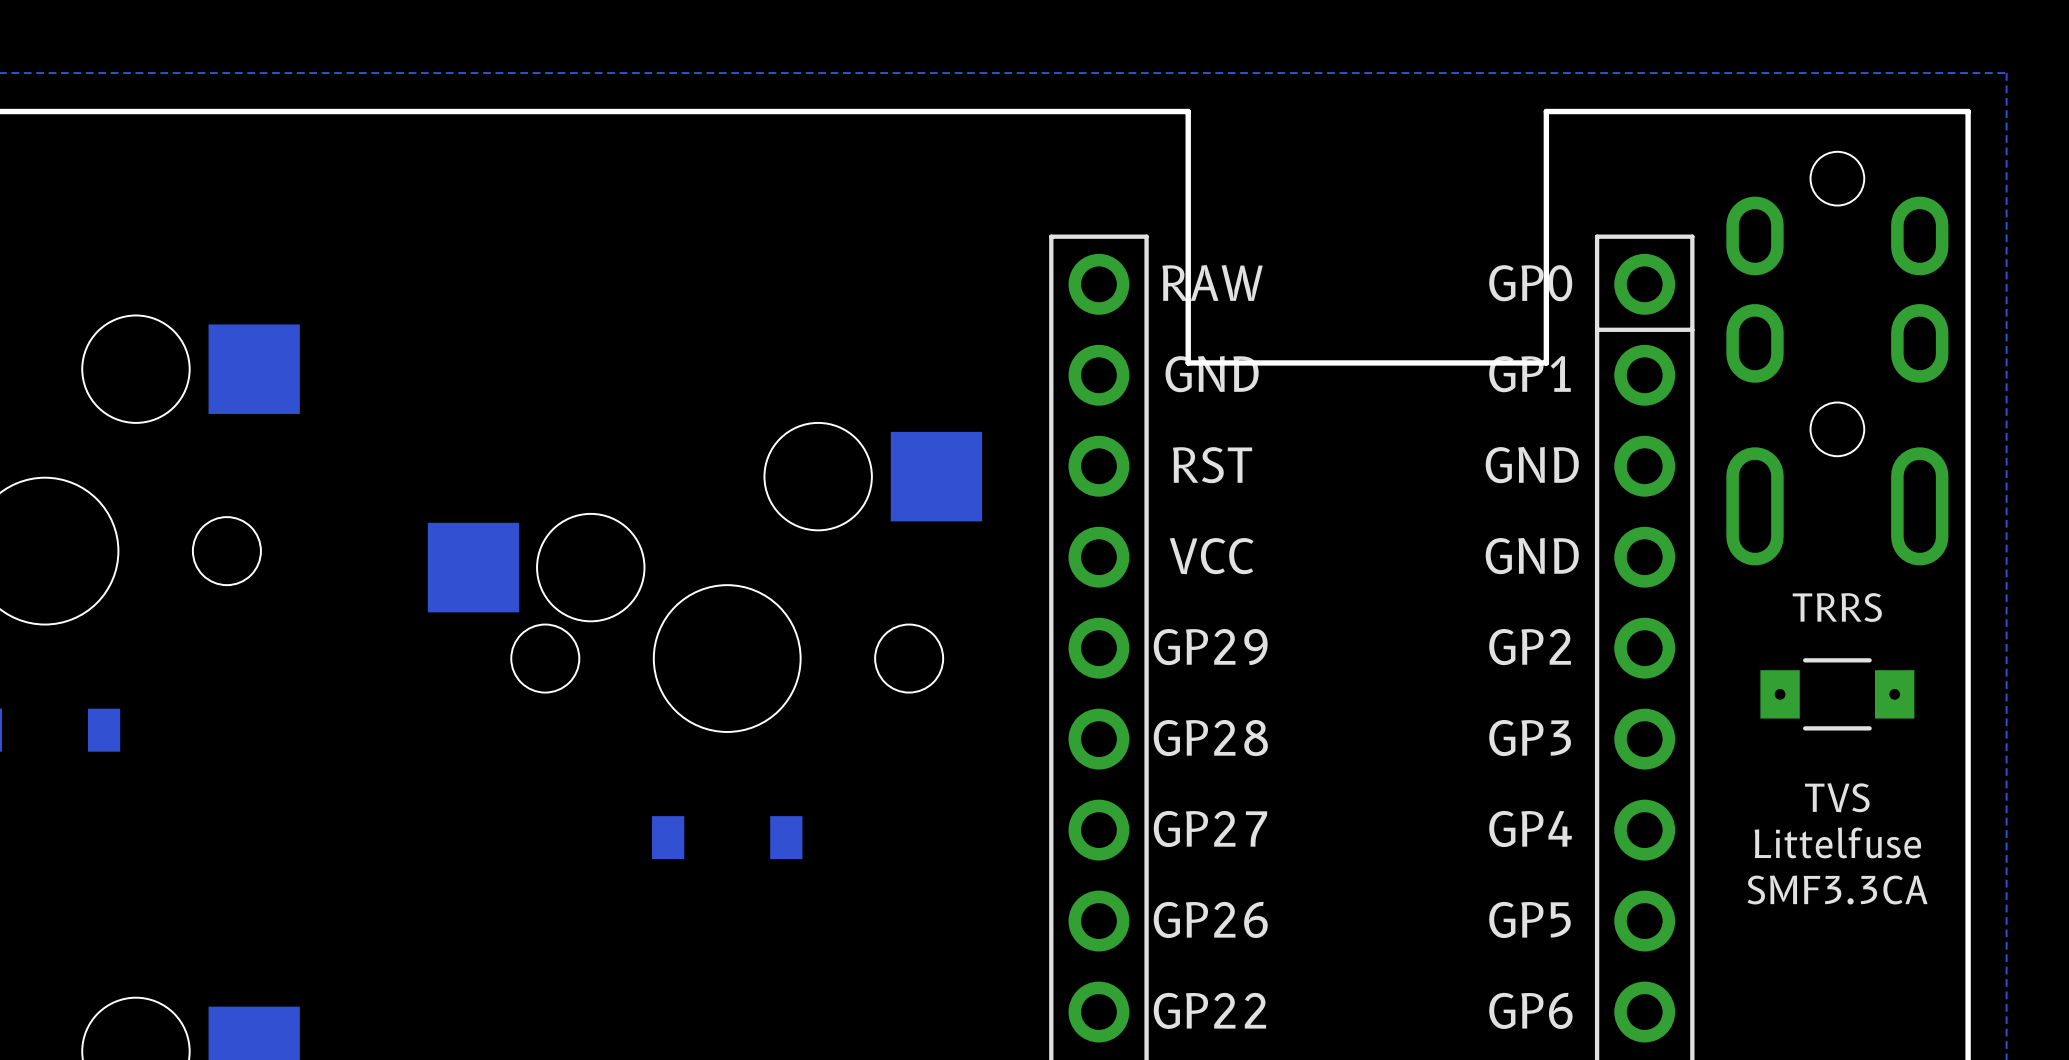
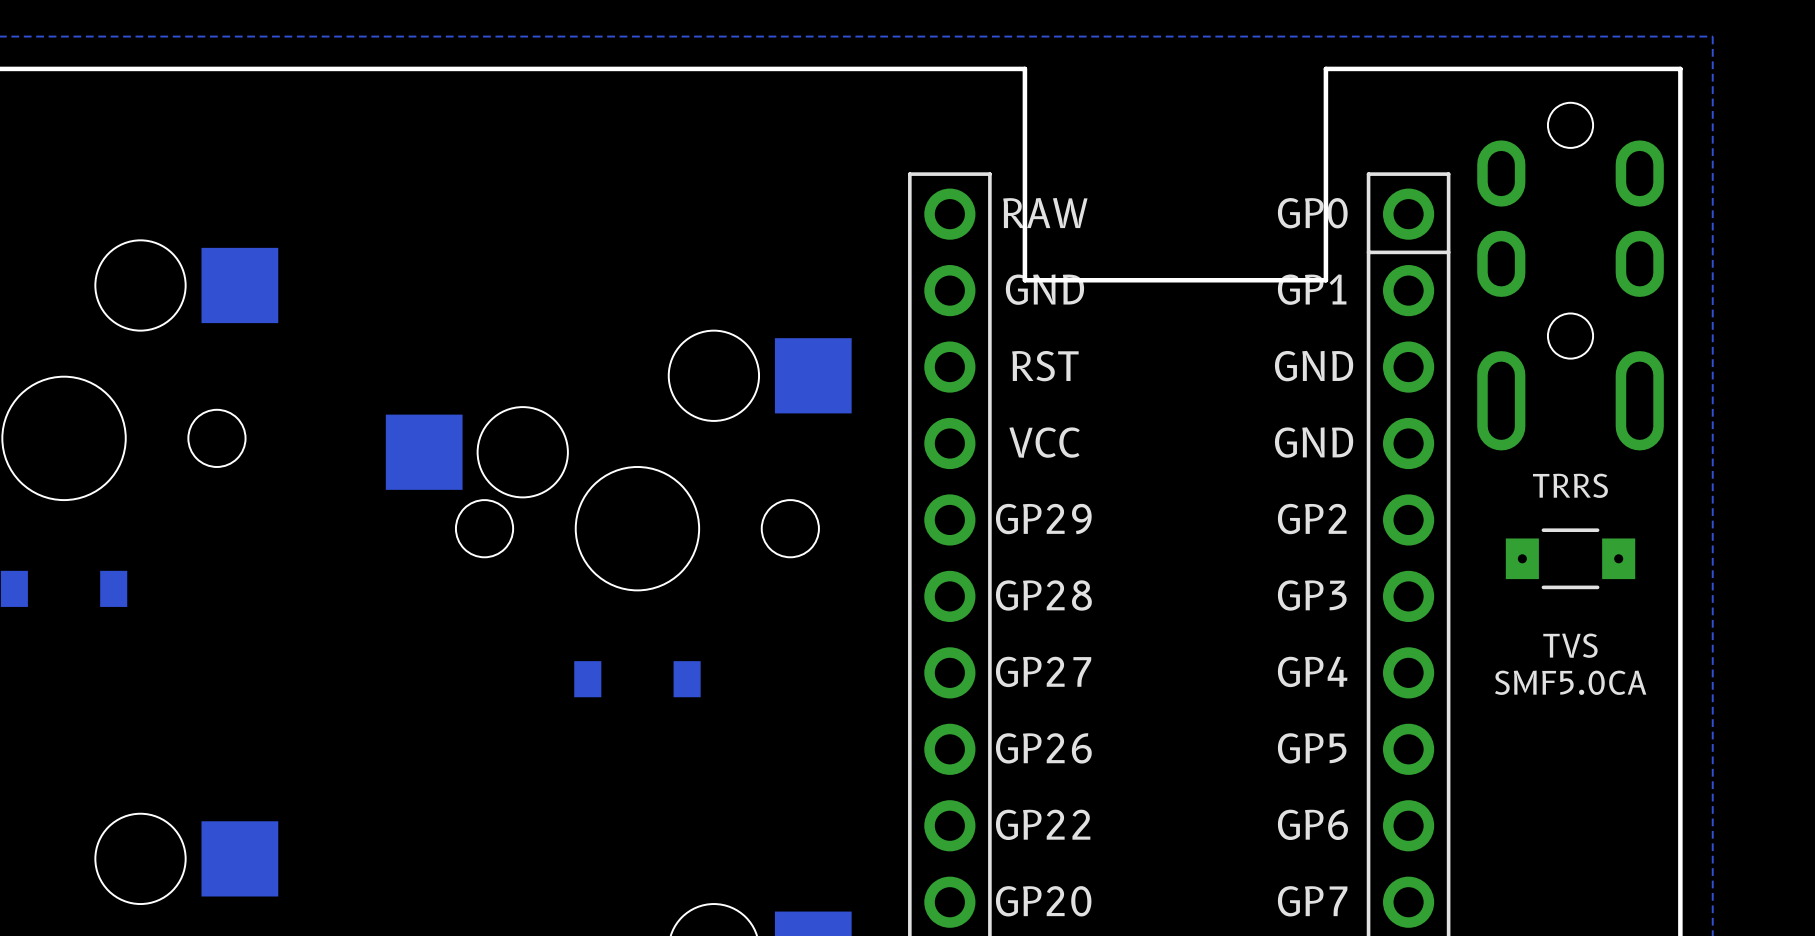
text: Littelfuse (1837, 842) -> SMF5.0CA (1570, 682)
text: SMF3.3CA (1837, 889) -> none

